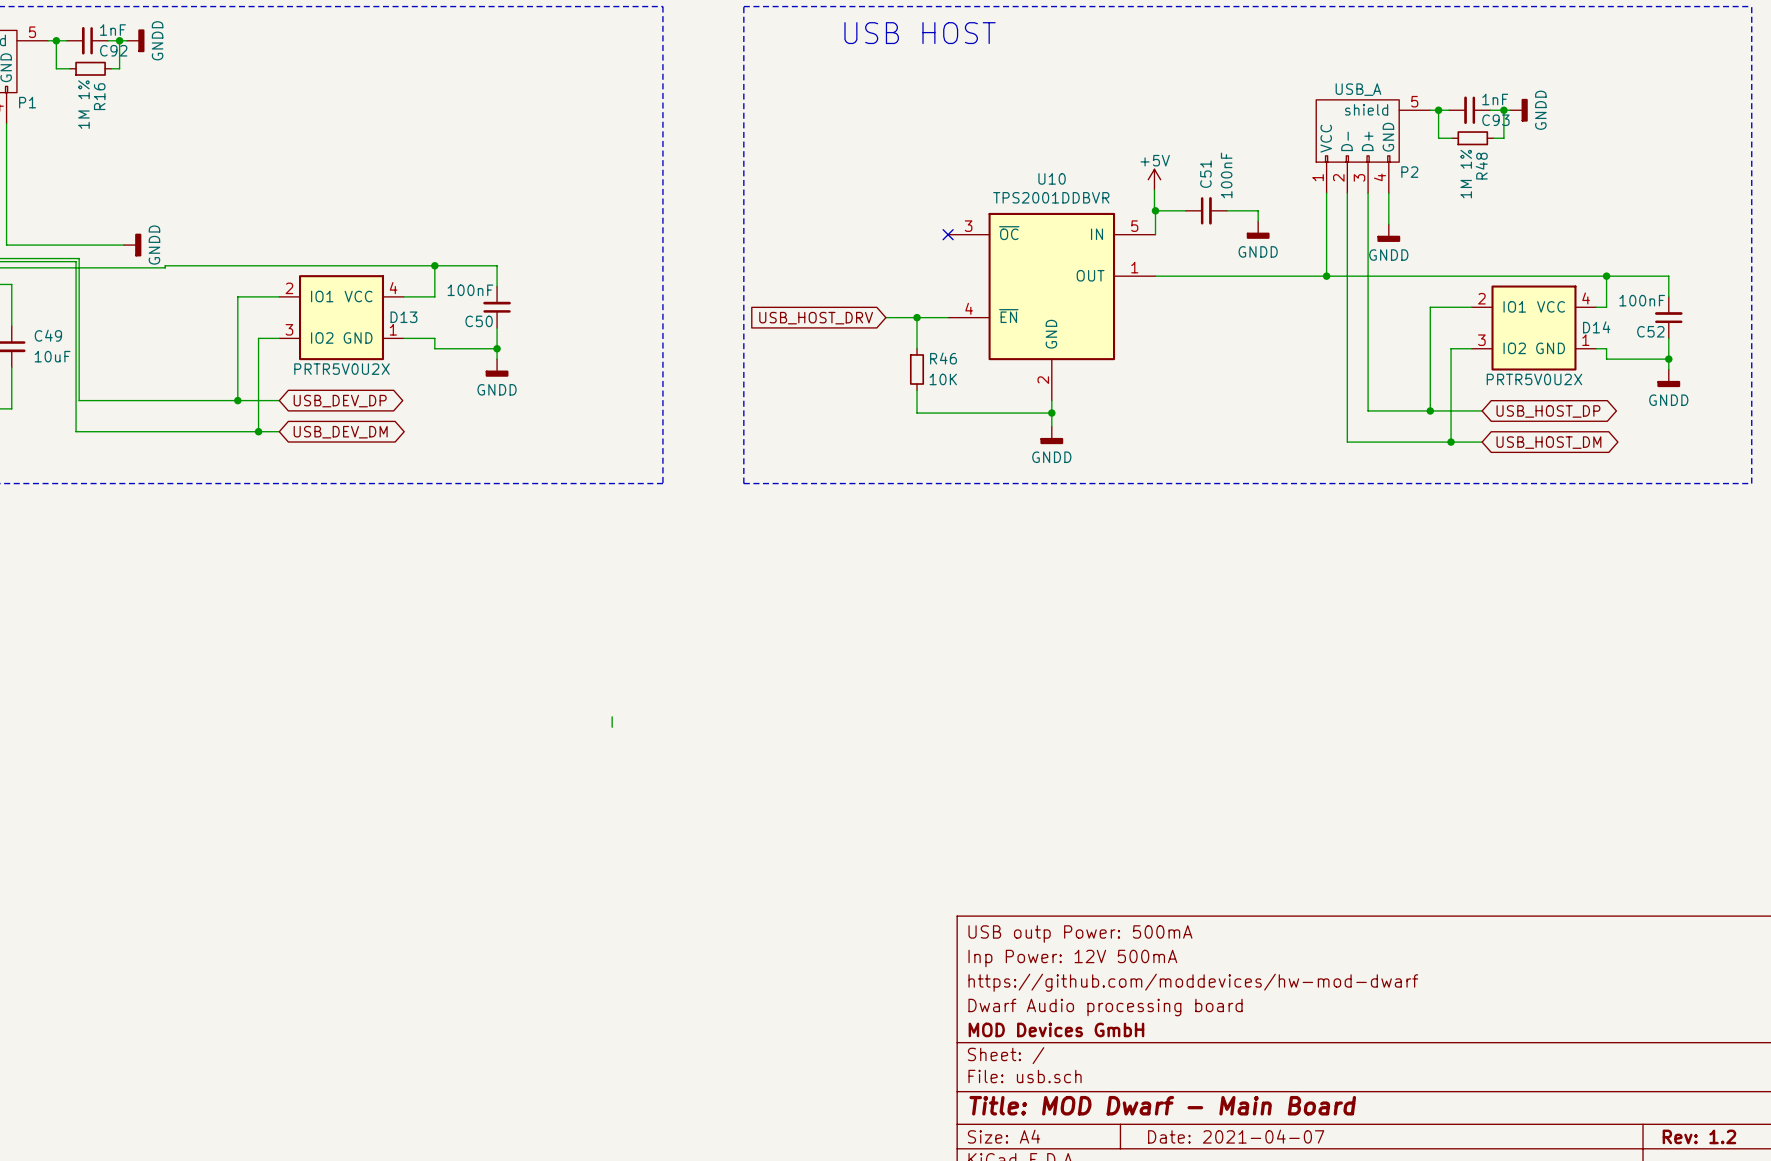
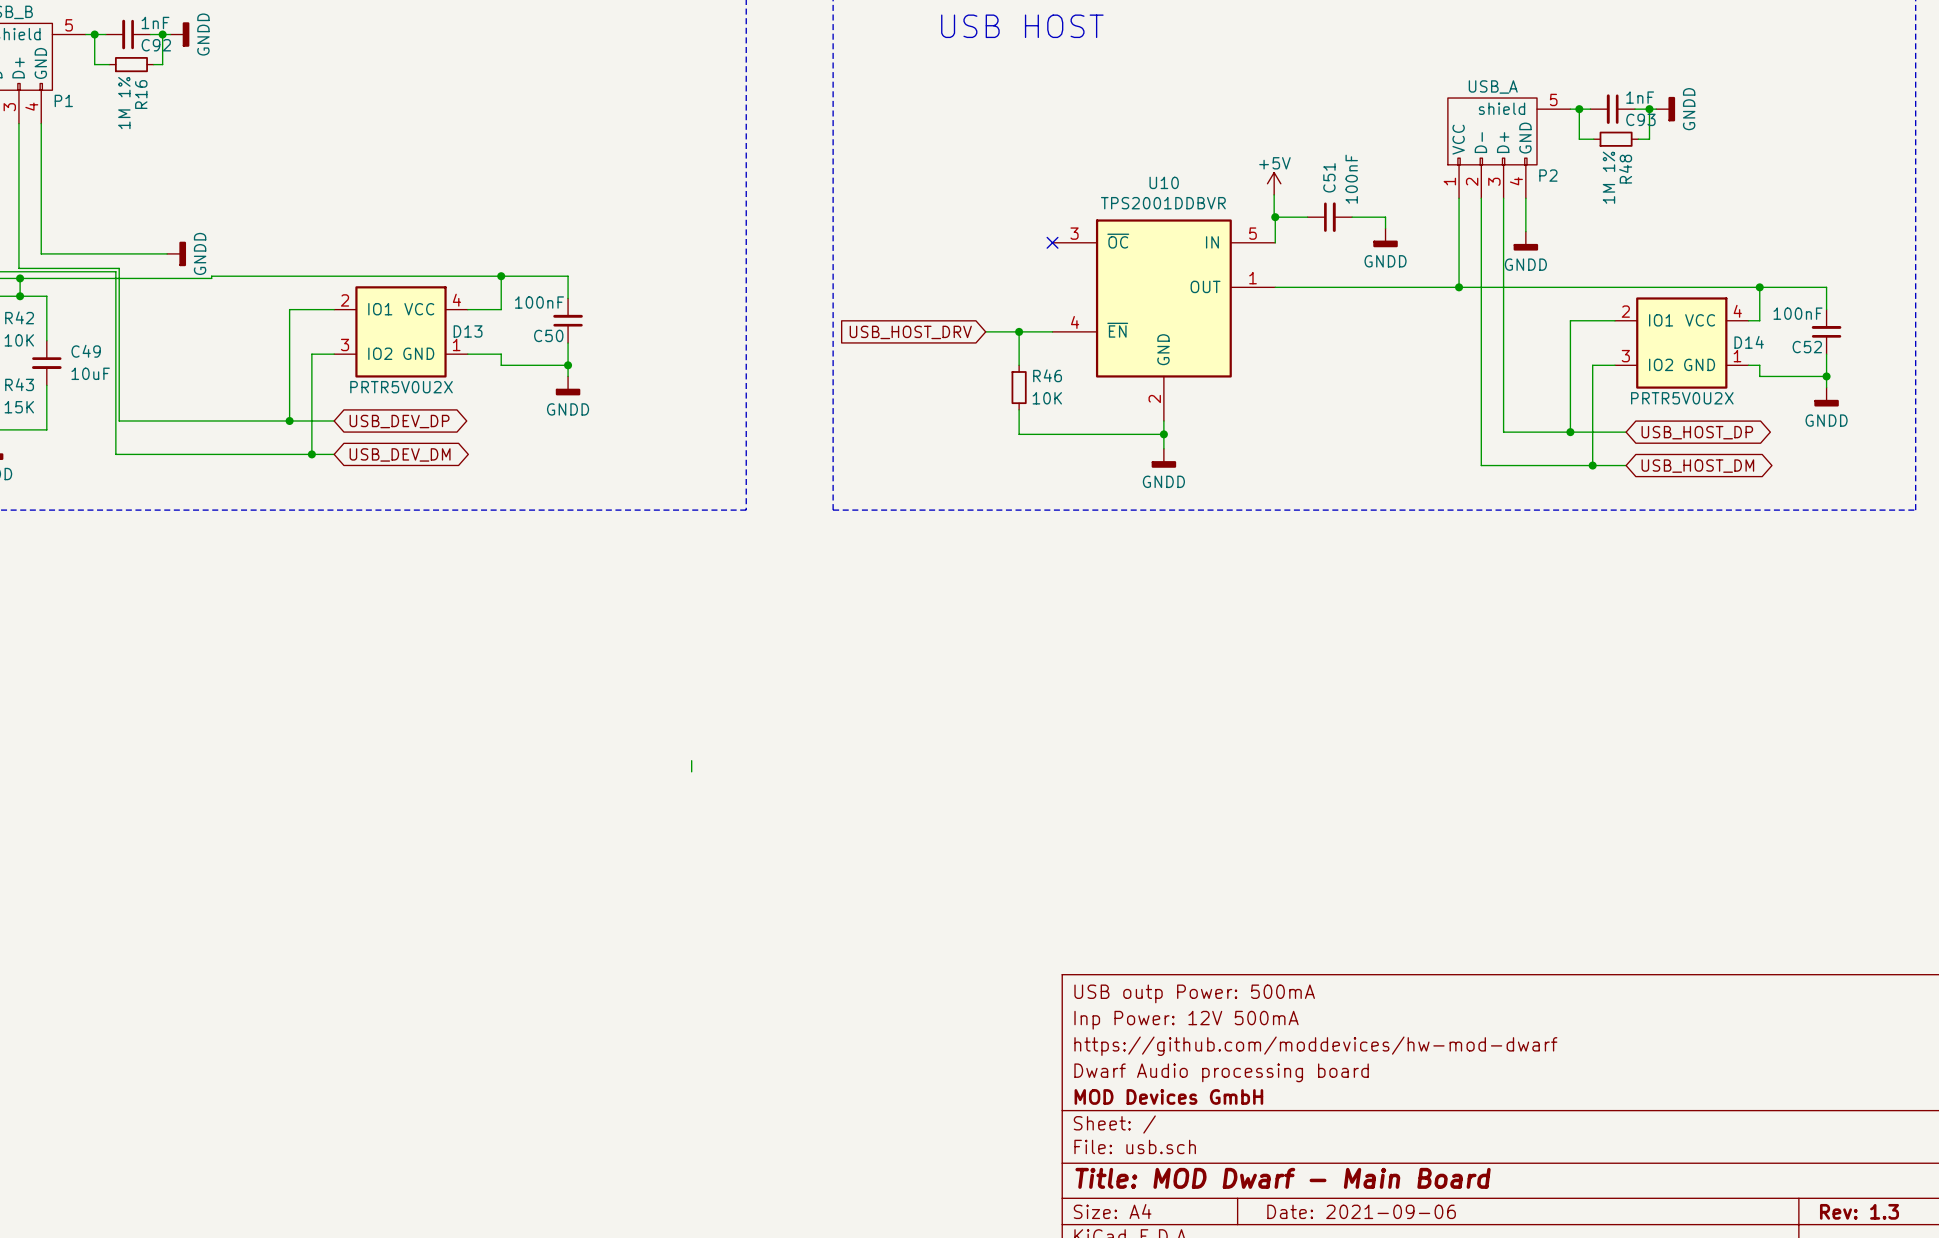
title block: Date: 2021-04-07 (1236, 1136) -> Date: 2021-09-06 (1361, 1211)
title block: Rev: 1.2 (1699, 1136) -> Rev: 1.3 (1859, 1211)

